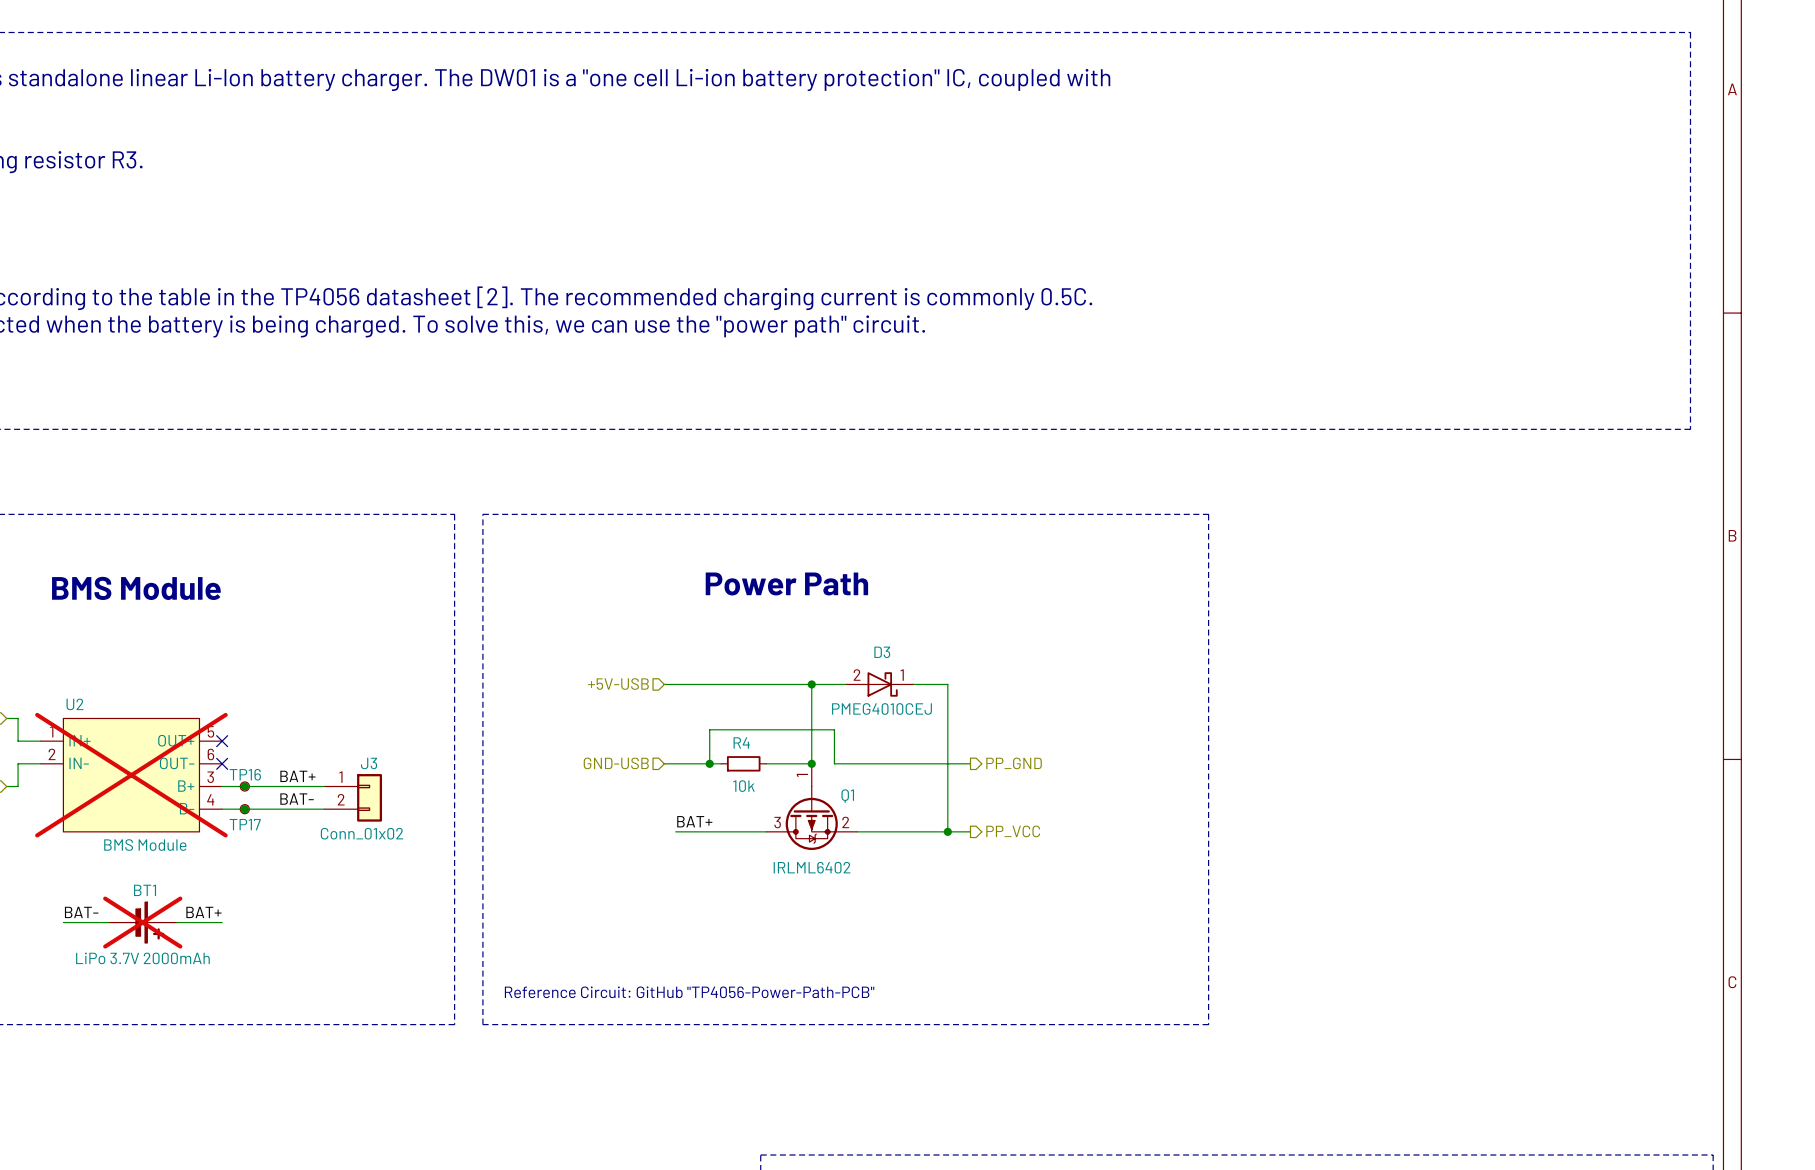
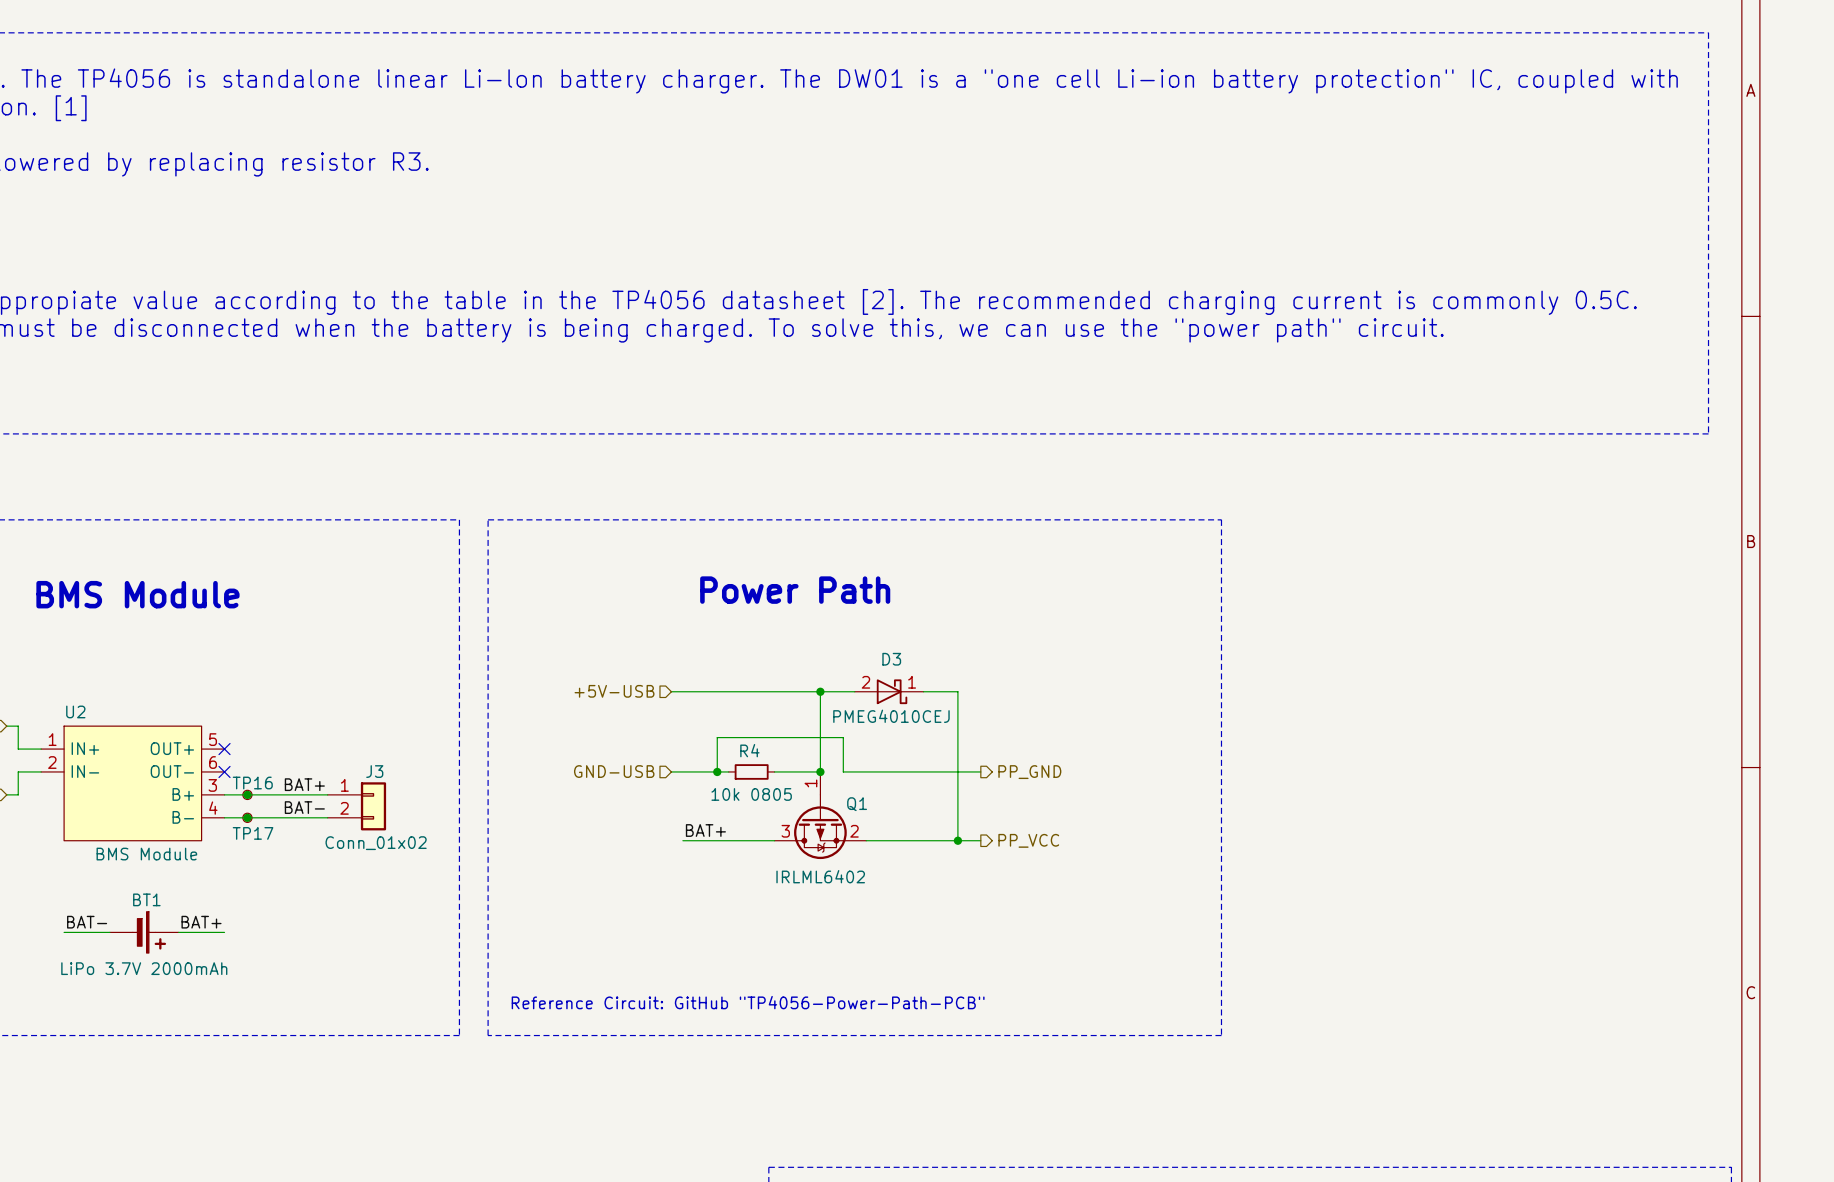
U2 do-not-place cross: (131, 775) -> none
R4 value: 10k (743, 786) -> 10k 0805 (751, 794)
BT1 do-not-place cross: (142, 922) -> none

